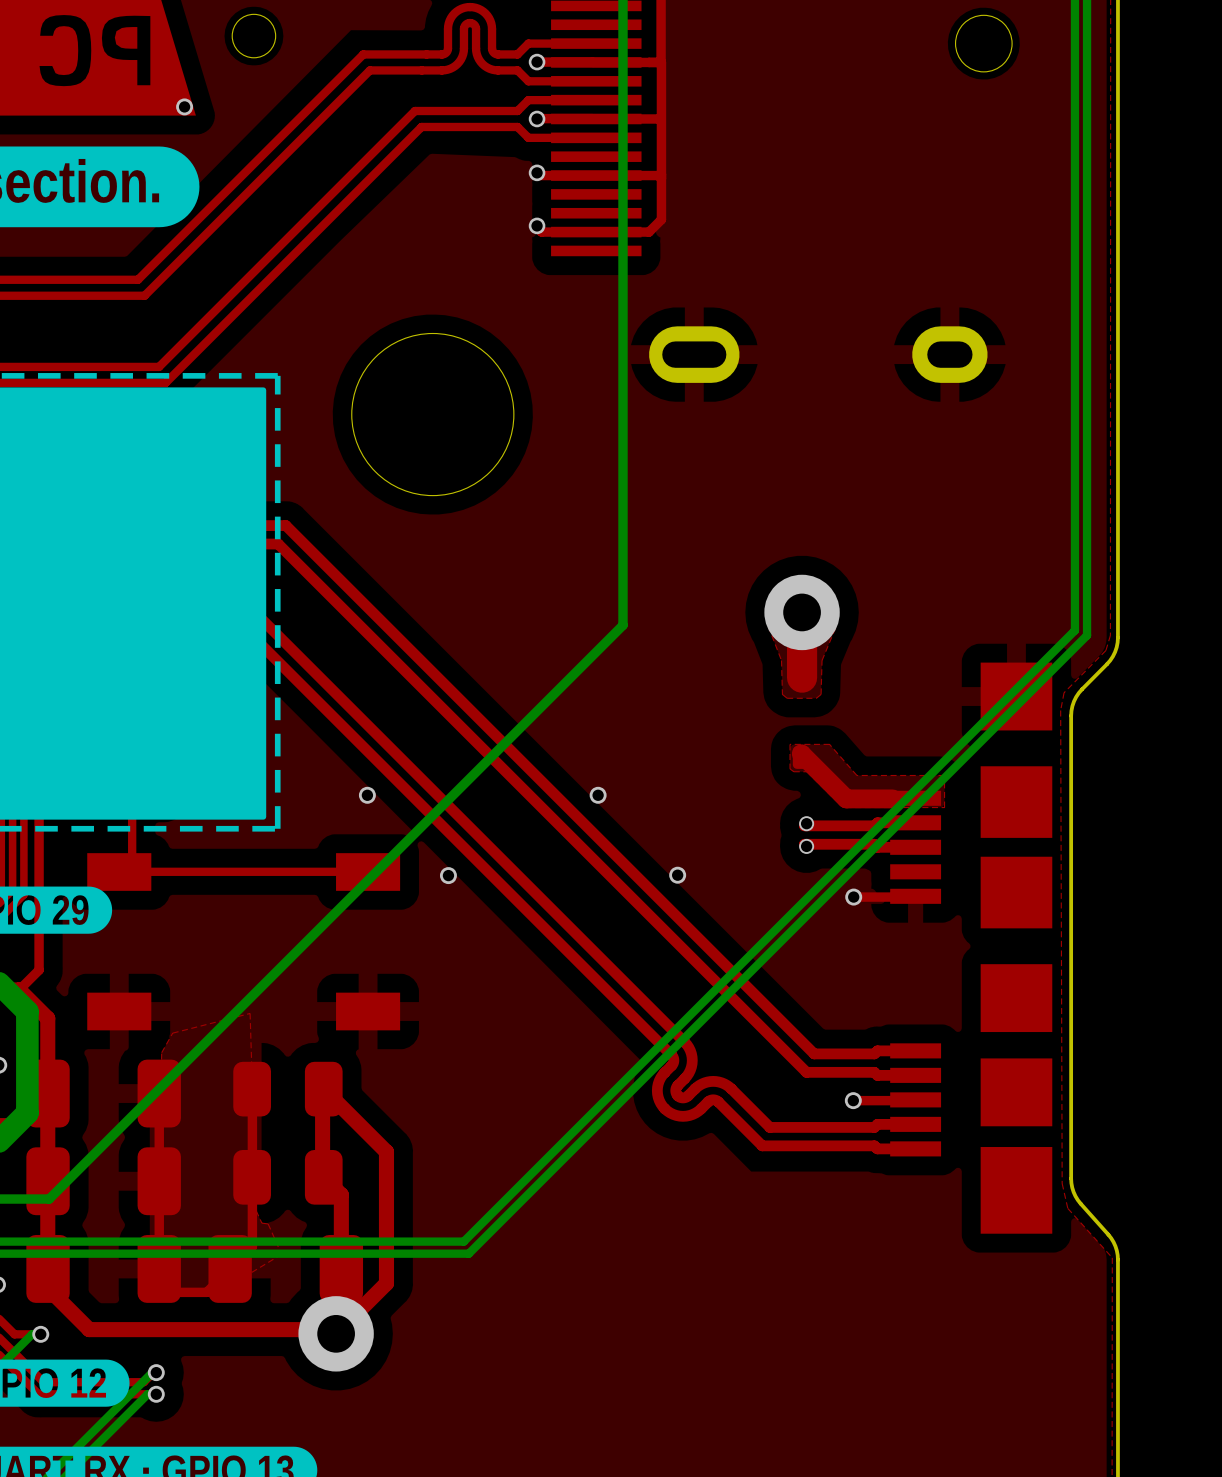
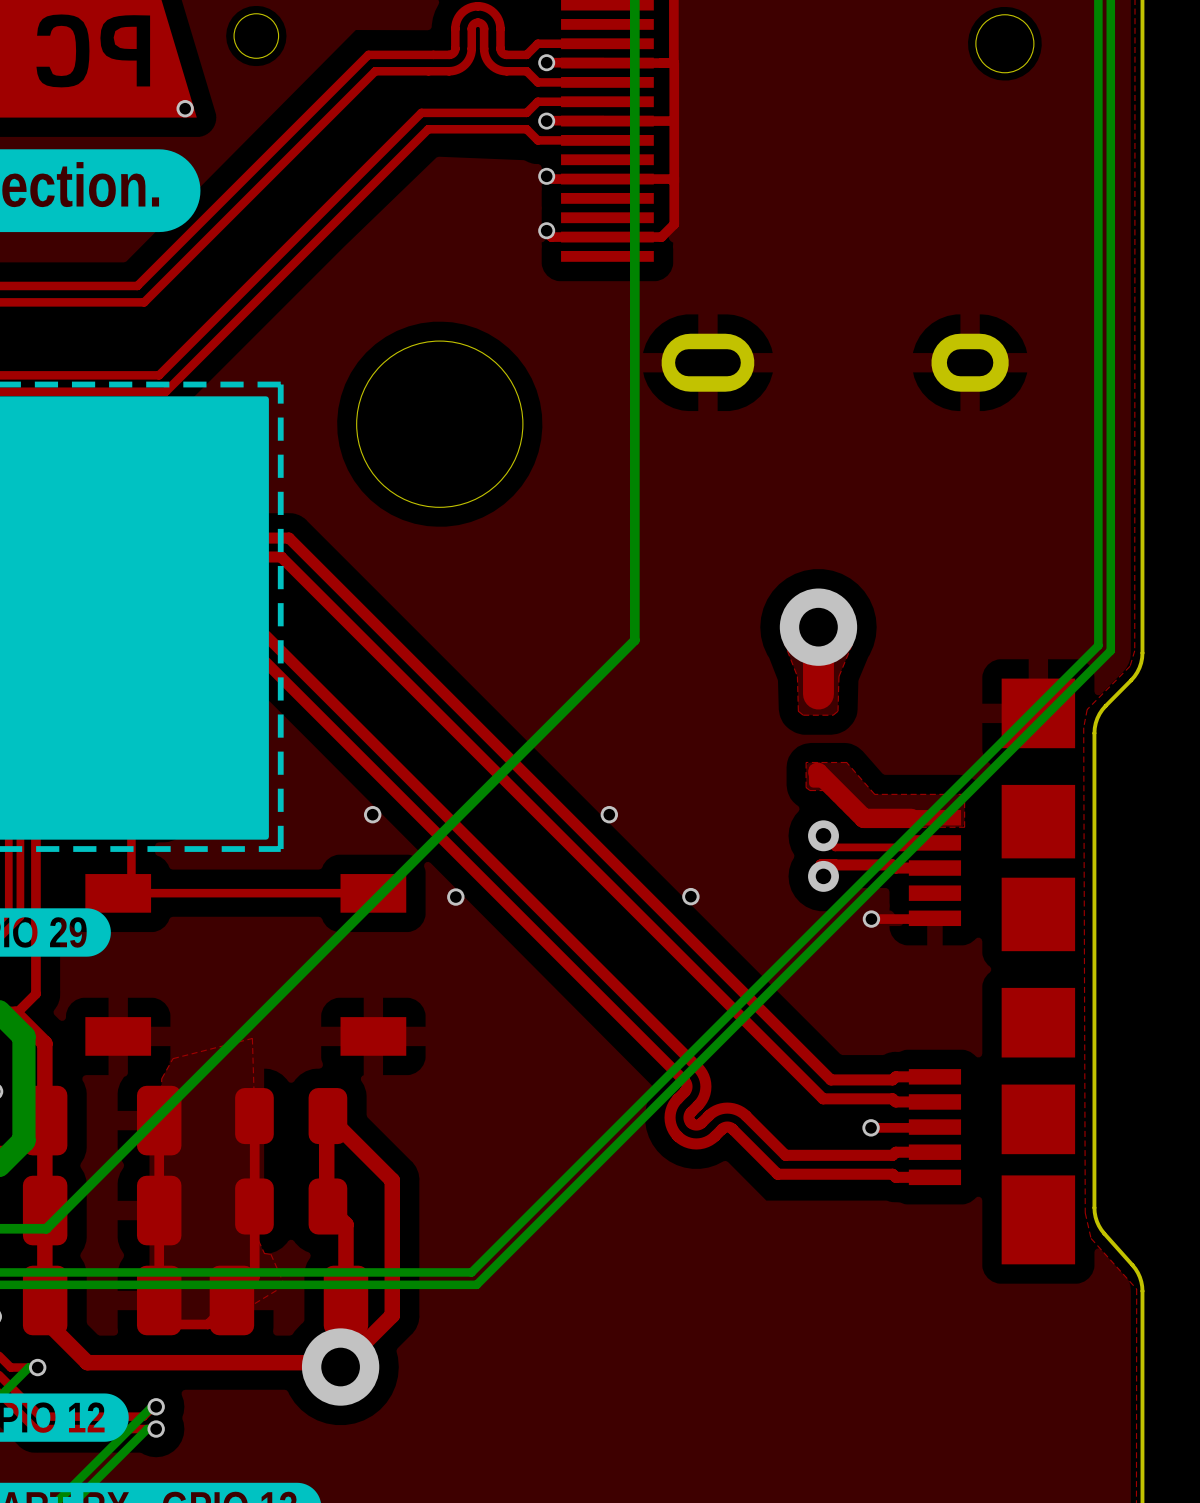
top track: none -> (823, 835) (835, 847) (907, 847) (911, 843)
via size: [799, 816, 815, 832] -> [808, 820, 839, 852]
top track: (806, 823) (804, 825) (874, 825) (877, 822) (915, 822) (913, 824) -> none
via size: [799, 838, 815, 854] -> [808, 860, 839, 892]

